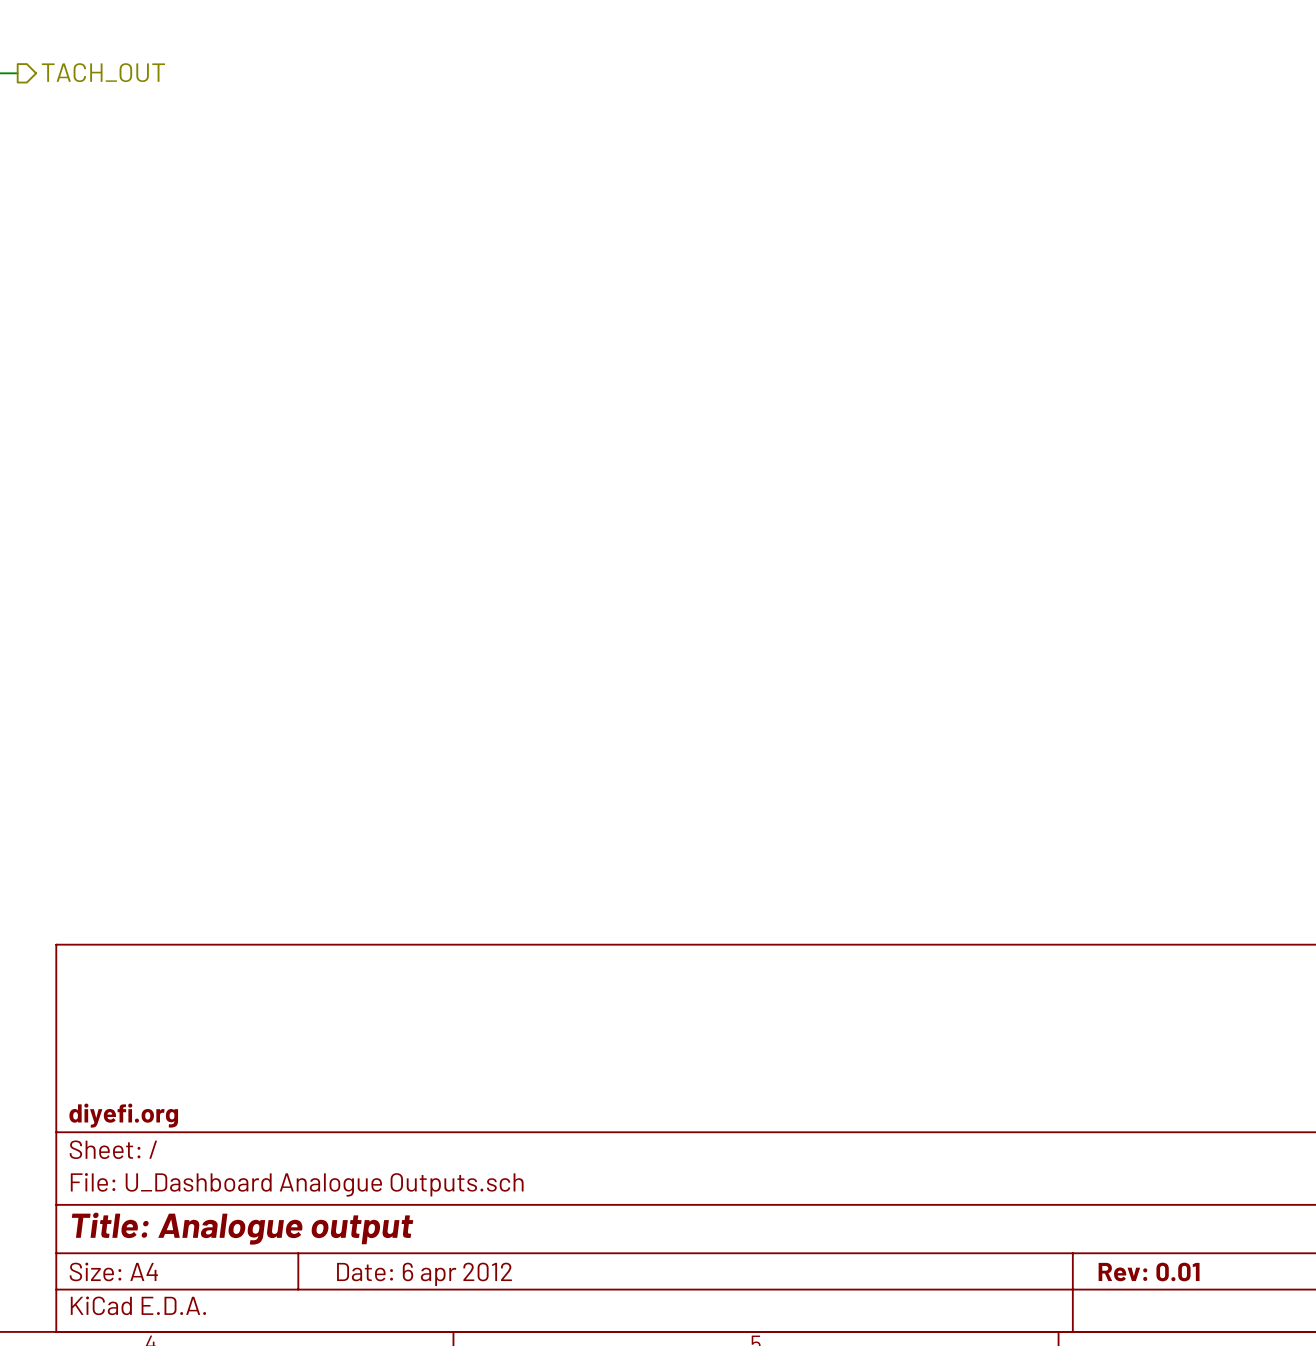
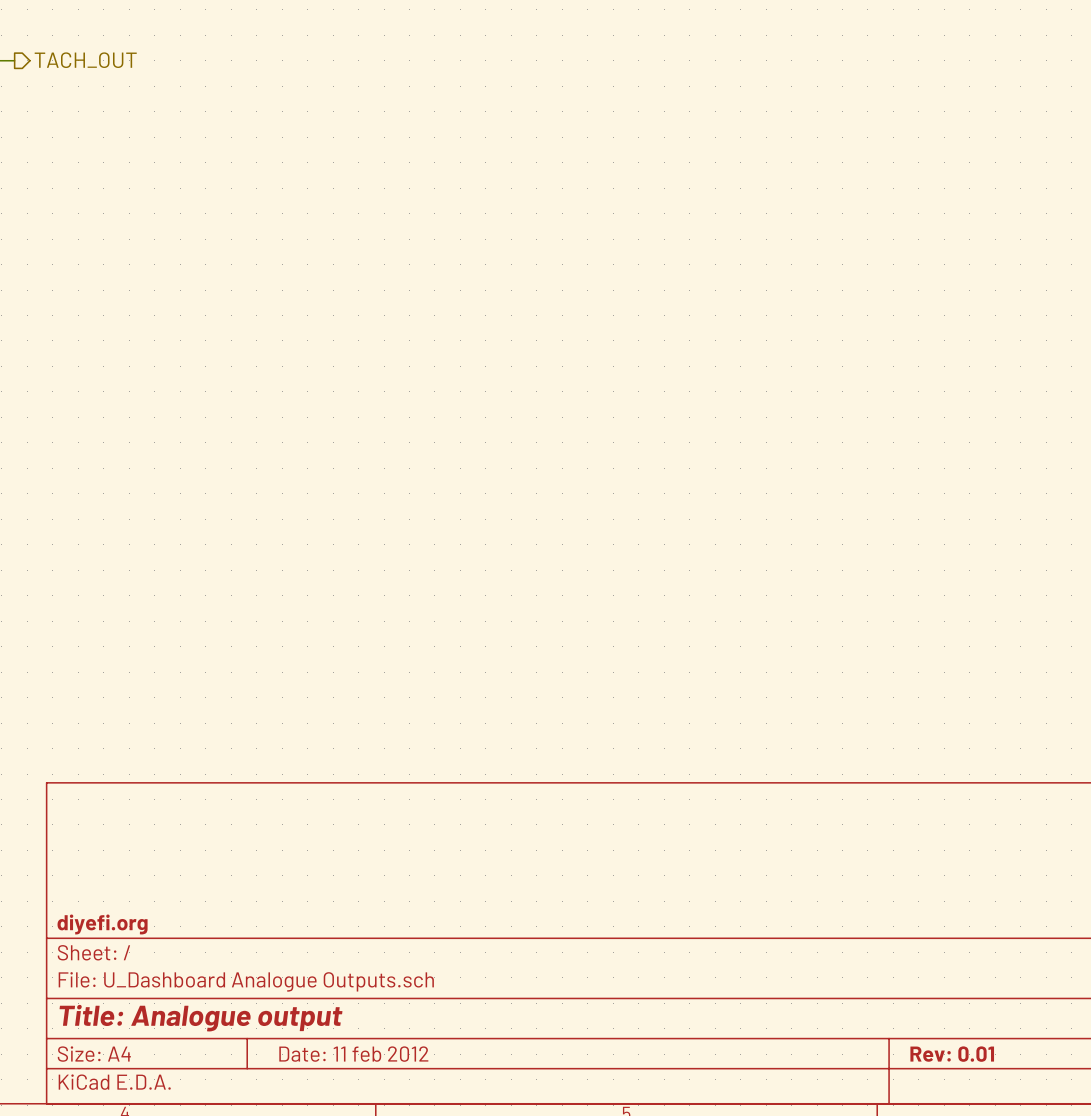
title block: Date: 6 apr 2012 (424, 1274) -> Date: 11 feb 2012 (353, 1054)

